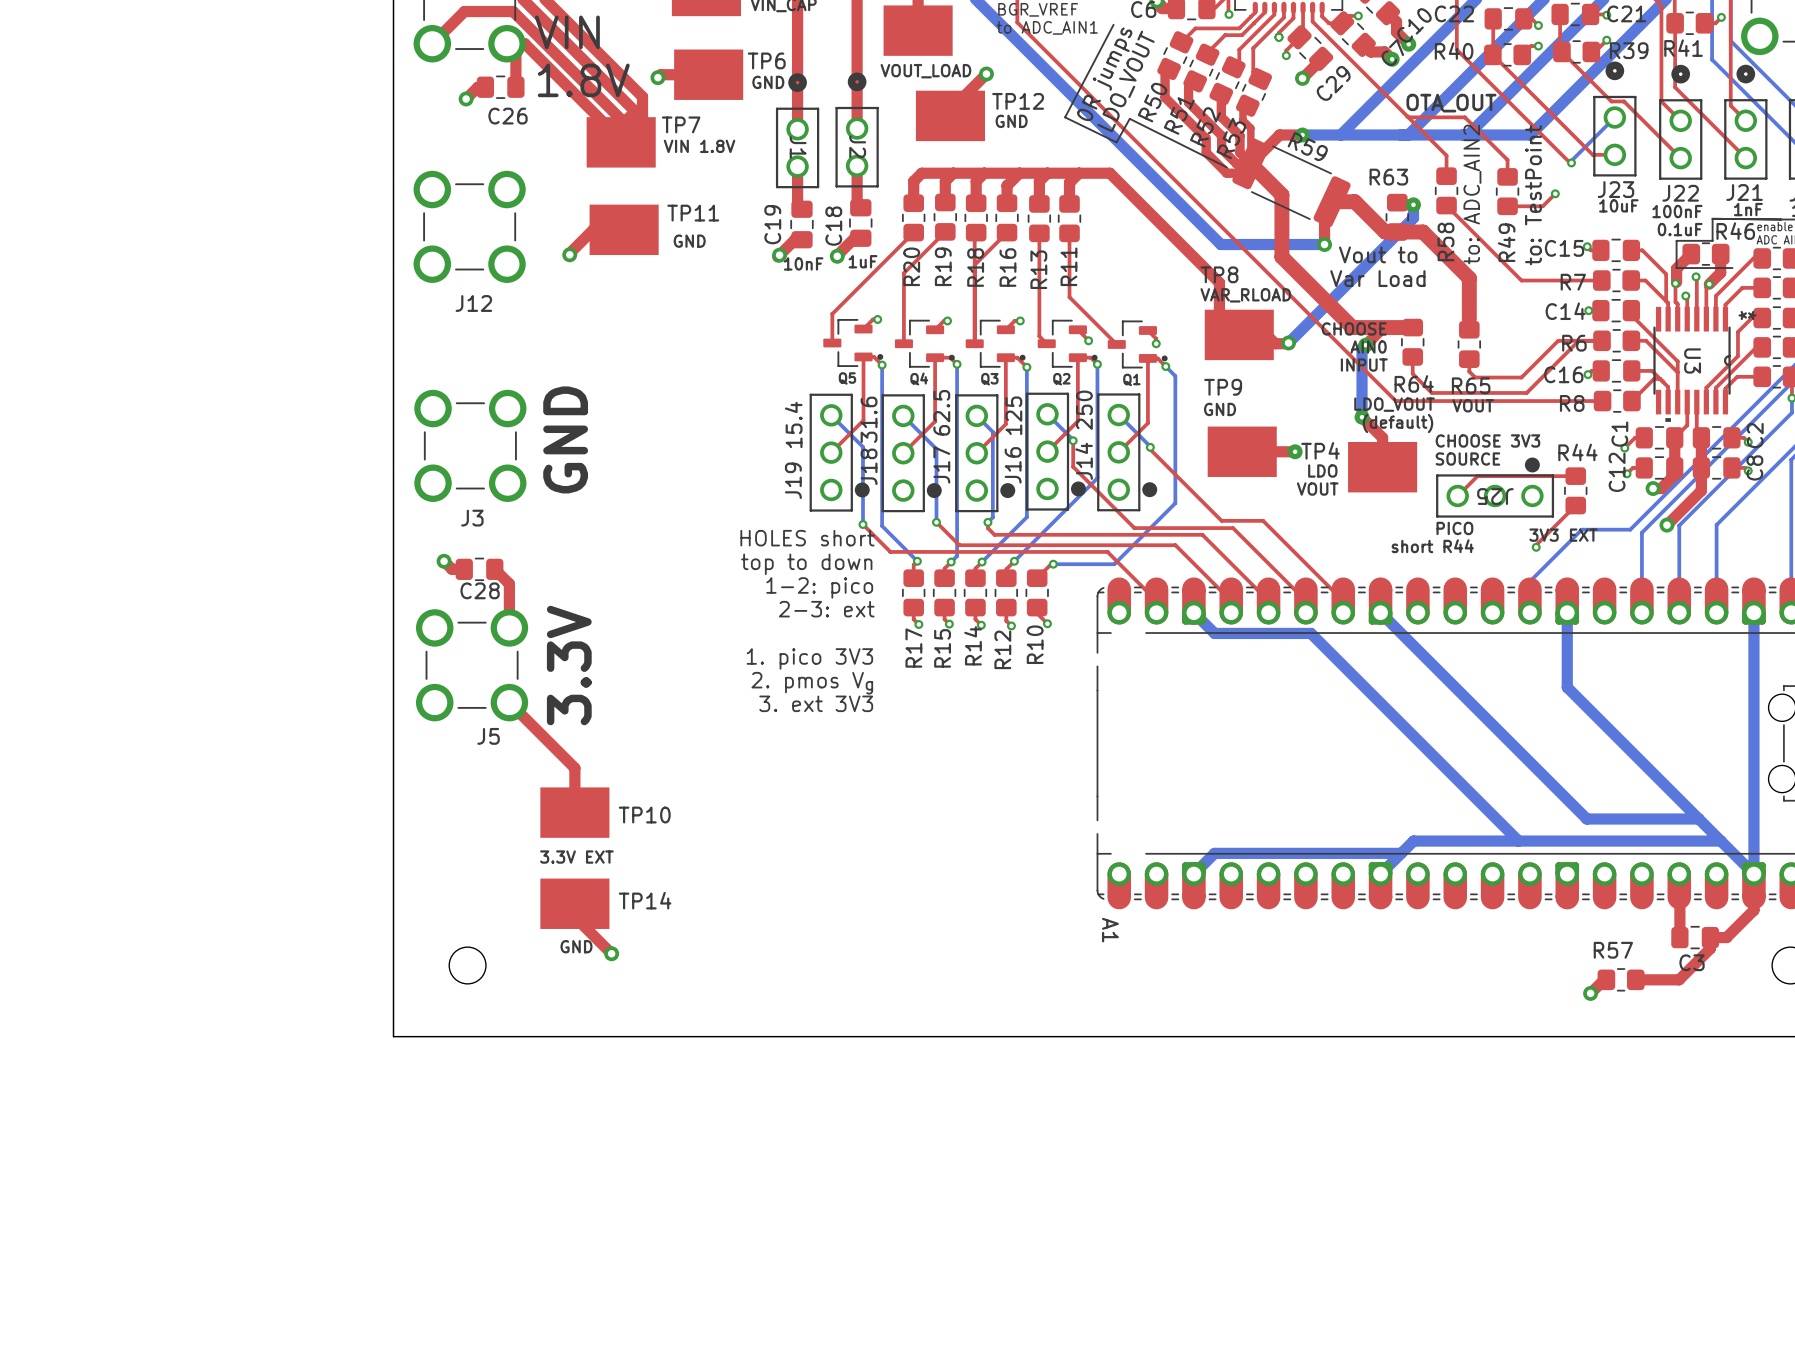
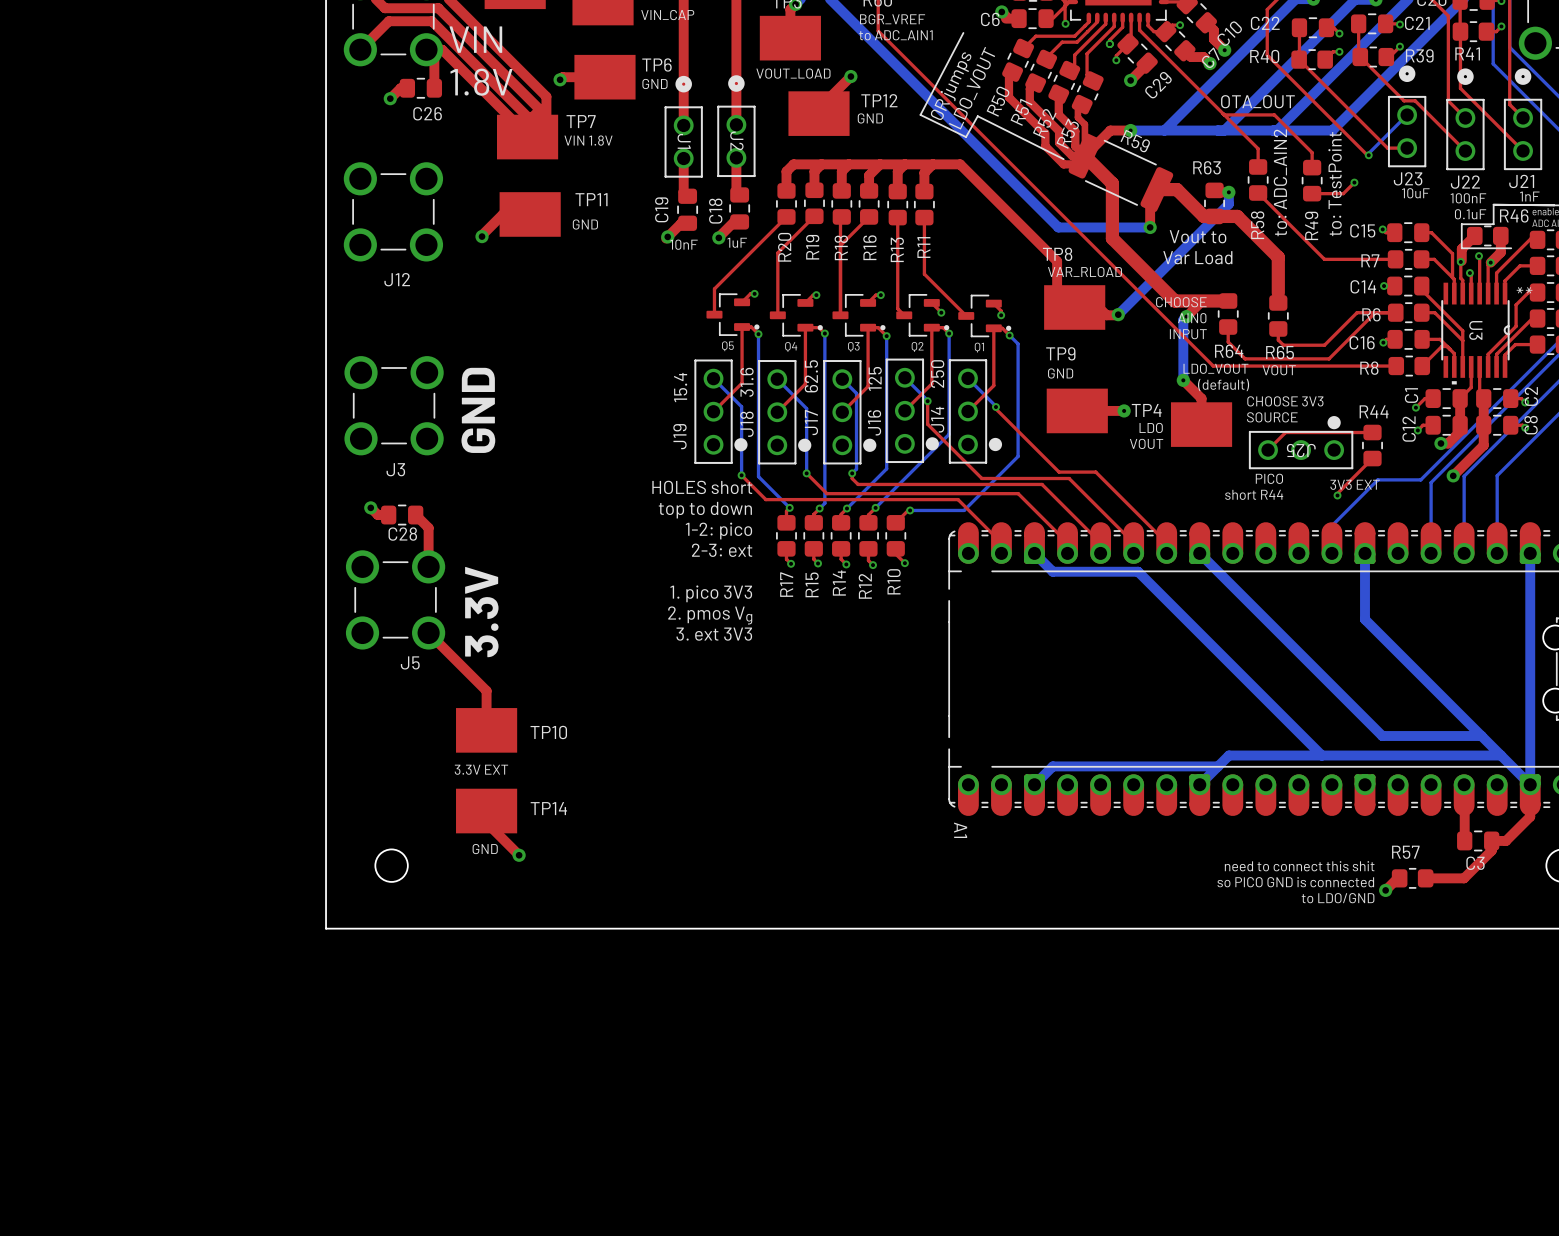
text: none -> need to connect this shit (1299, 866)
text: none -> so PICO GND is connected (1295, 882)
text: none -> to LDO/GND (1338, 898)

